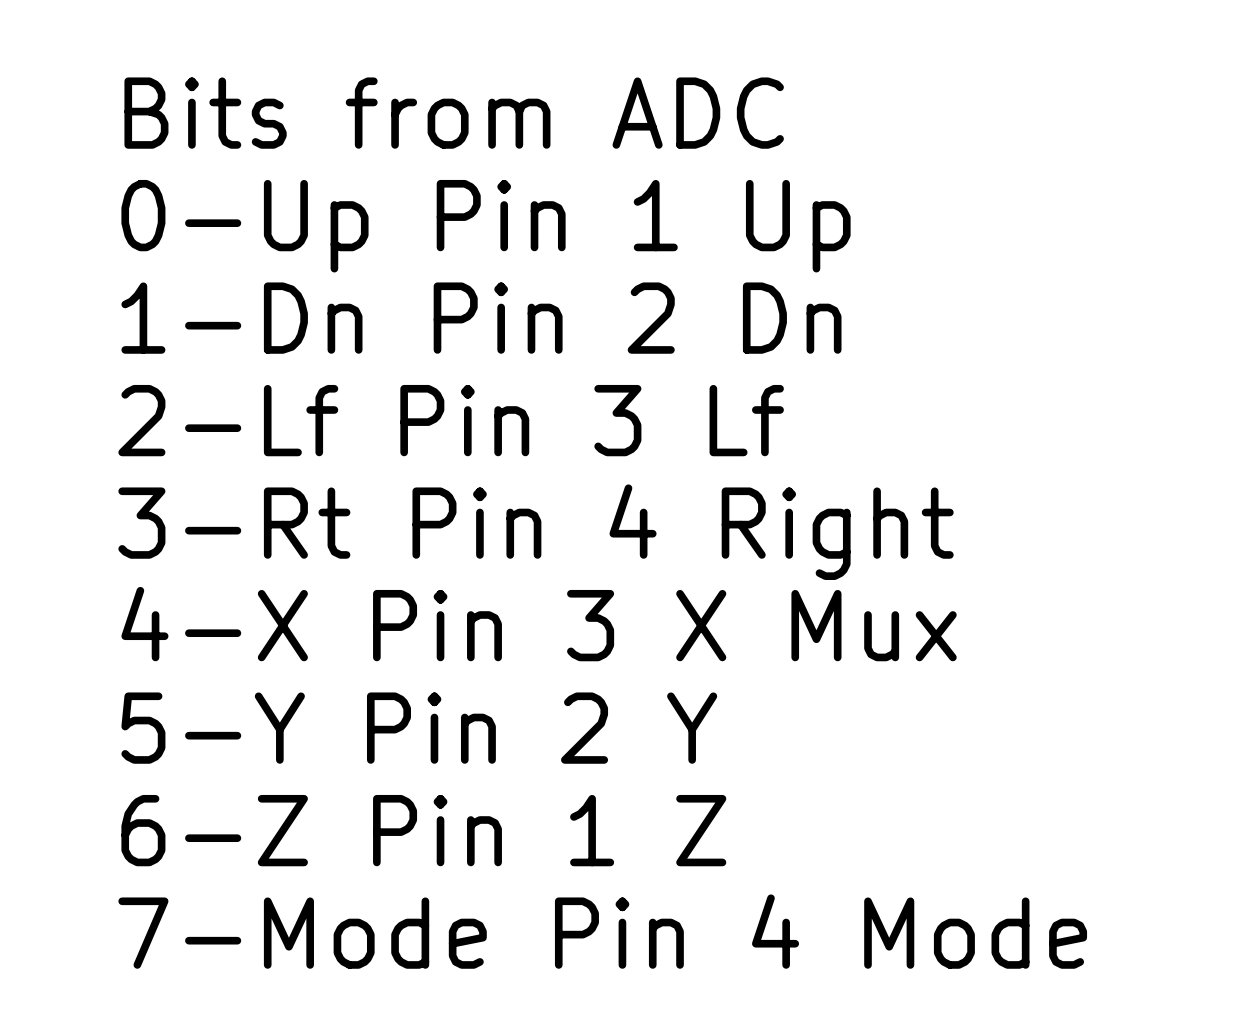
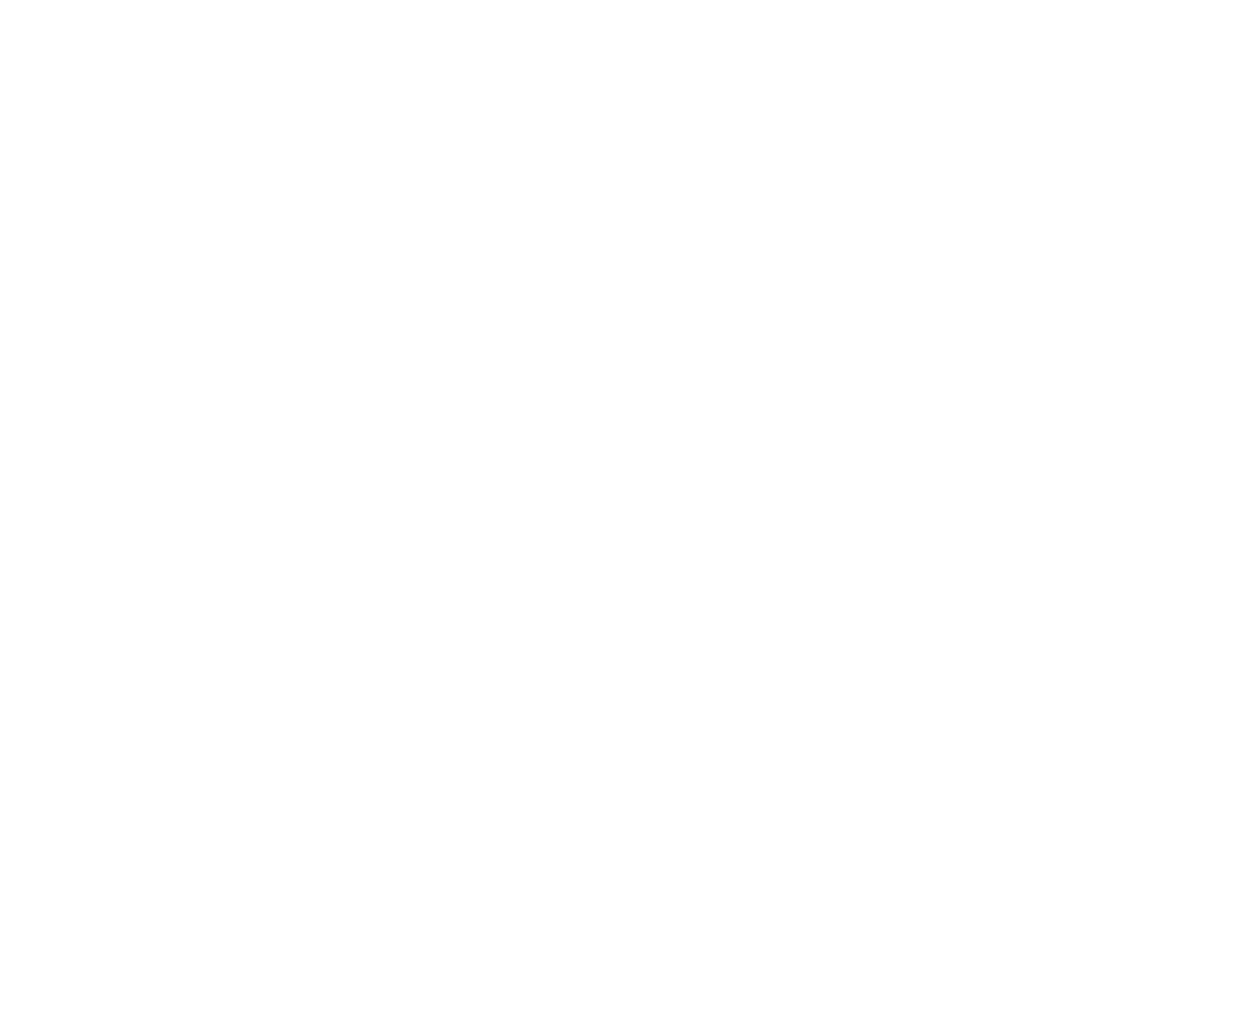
text: Bits from ADC (454, 113) -> none
text: 0-Up Pin 1 Up (486, 226) -> none
text: 1-Dn Pin 2 Dn (481, 318) -> none
text: 2-Lf Pin 3 Lf (451, 420) -> none
text: 3-Rt Pin 4 Right (536, 532) -> none
text: 4-X Pin 3 X Mux (539, 624) -> none
text: 5-Y Pin 2 Y (419, 728) -> none
text: 6-Z Pin 1 Z (423, 830) -> none
text: 7-Mode Pin 4 Mode (602, 931) -> none

